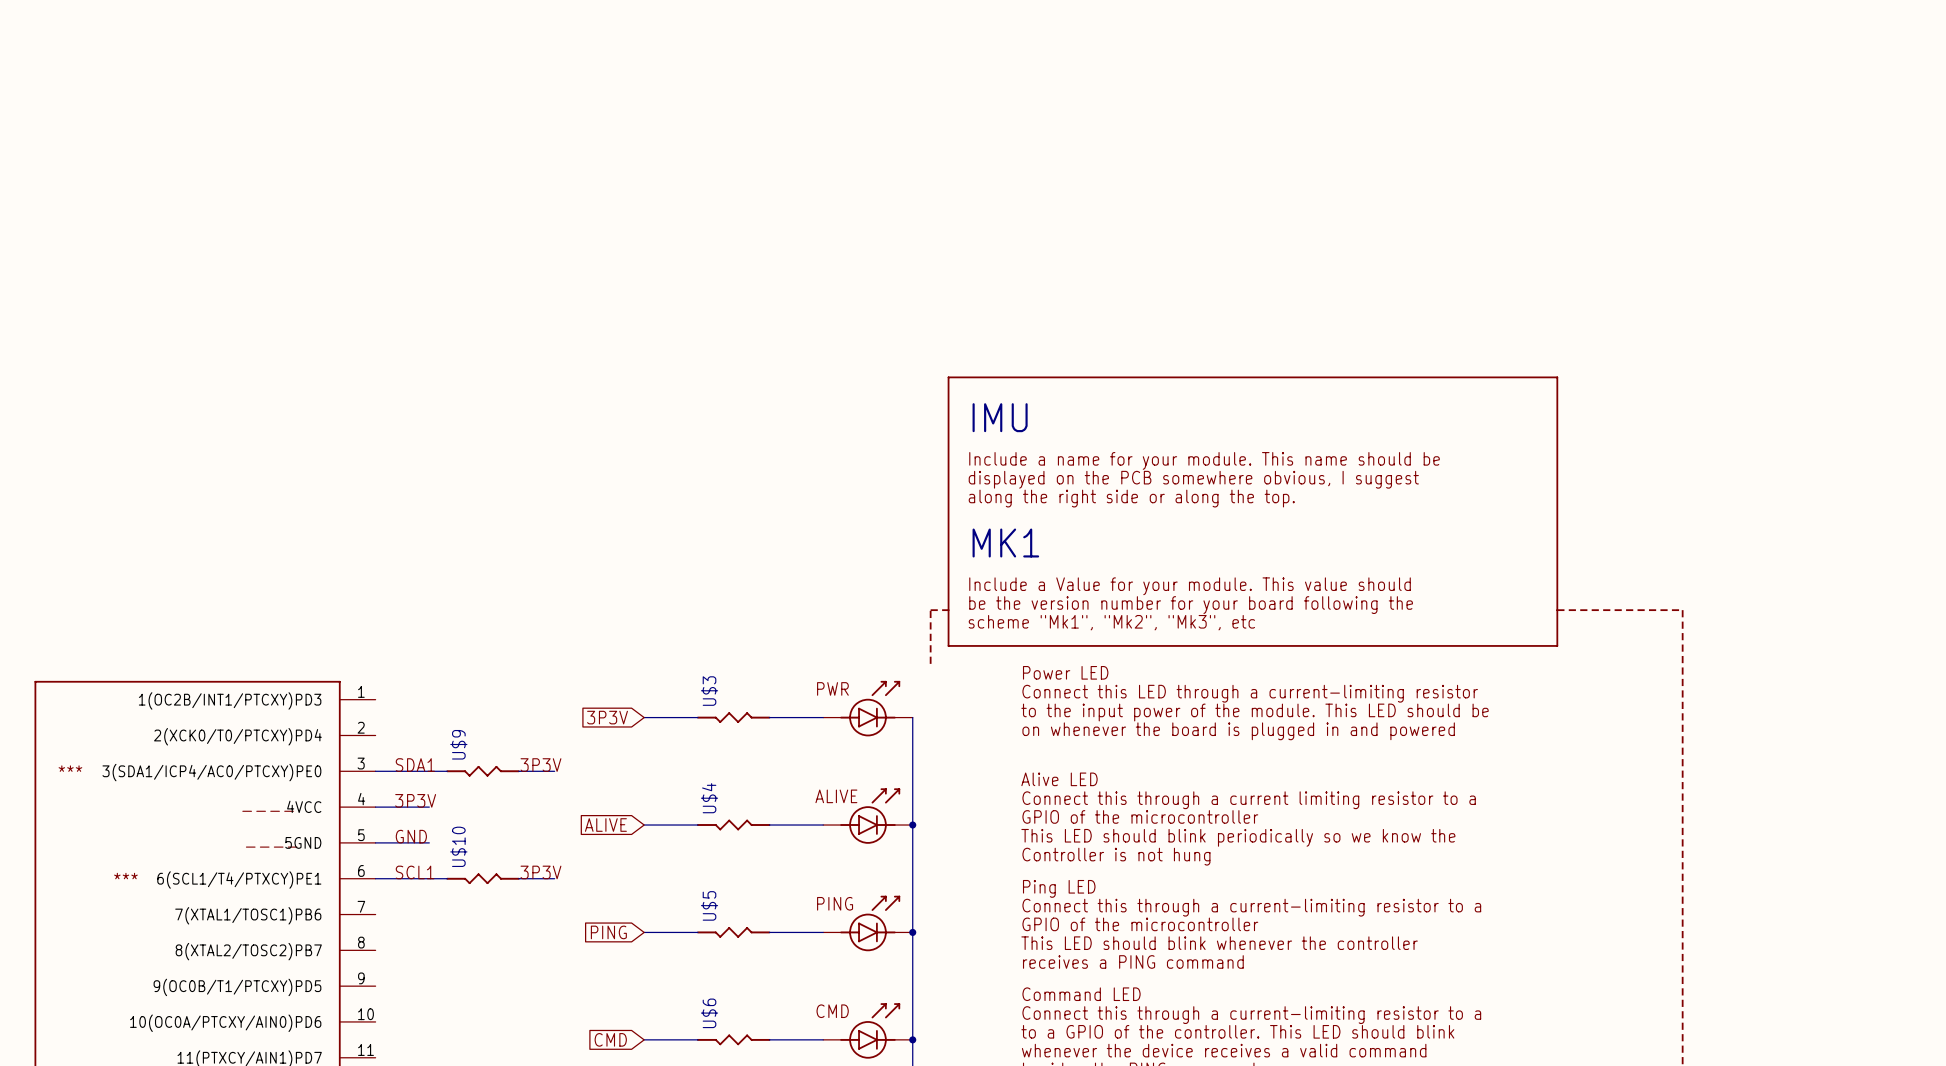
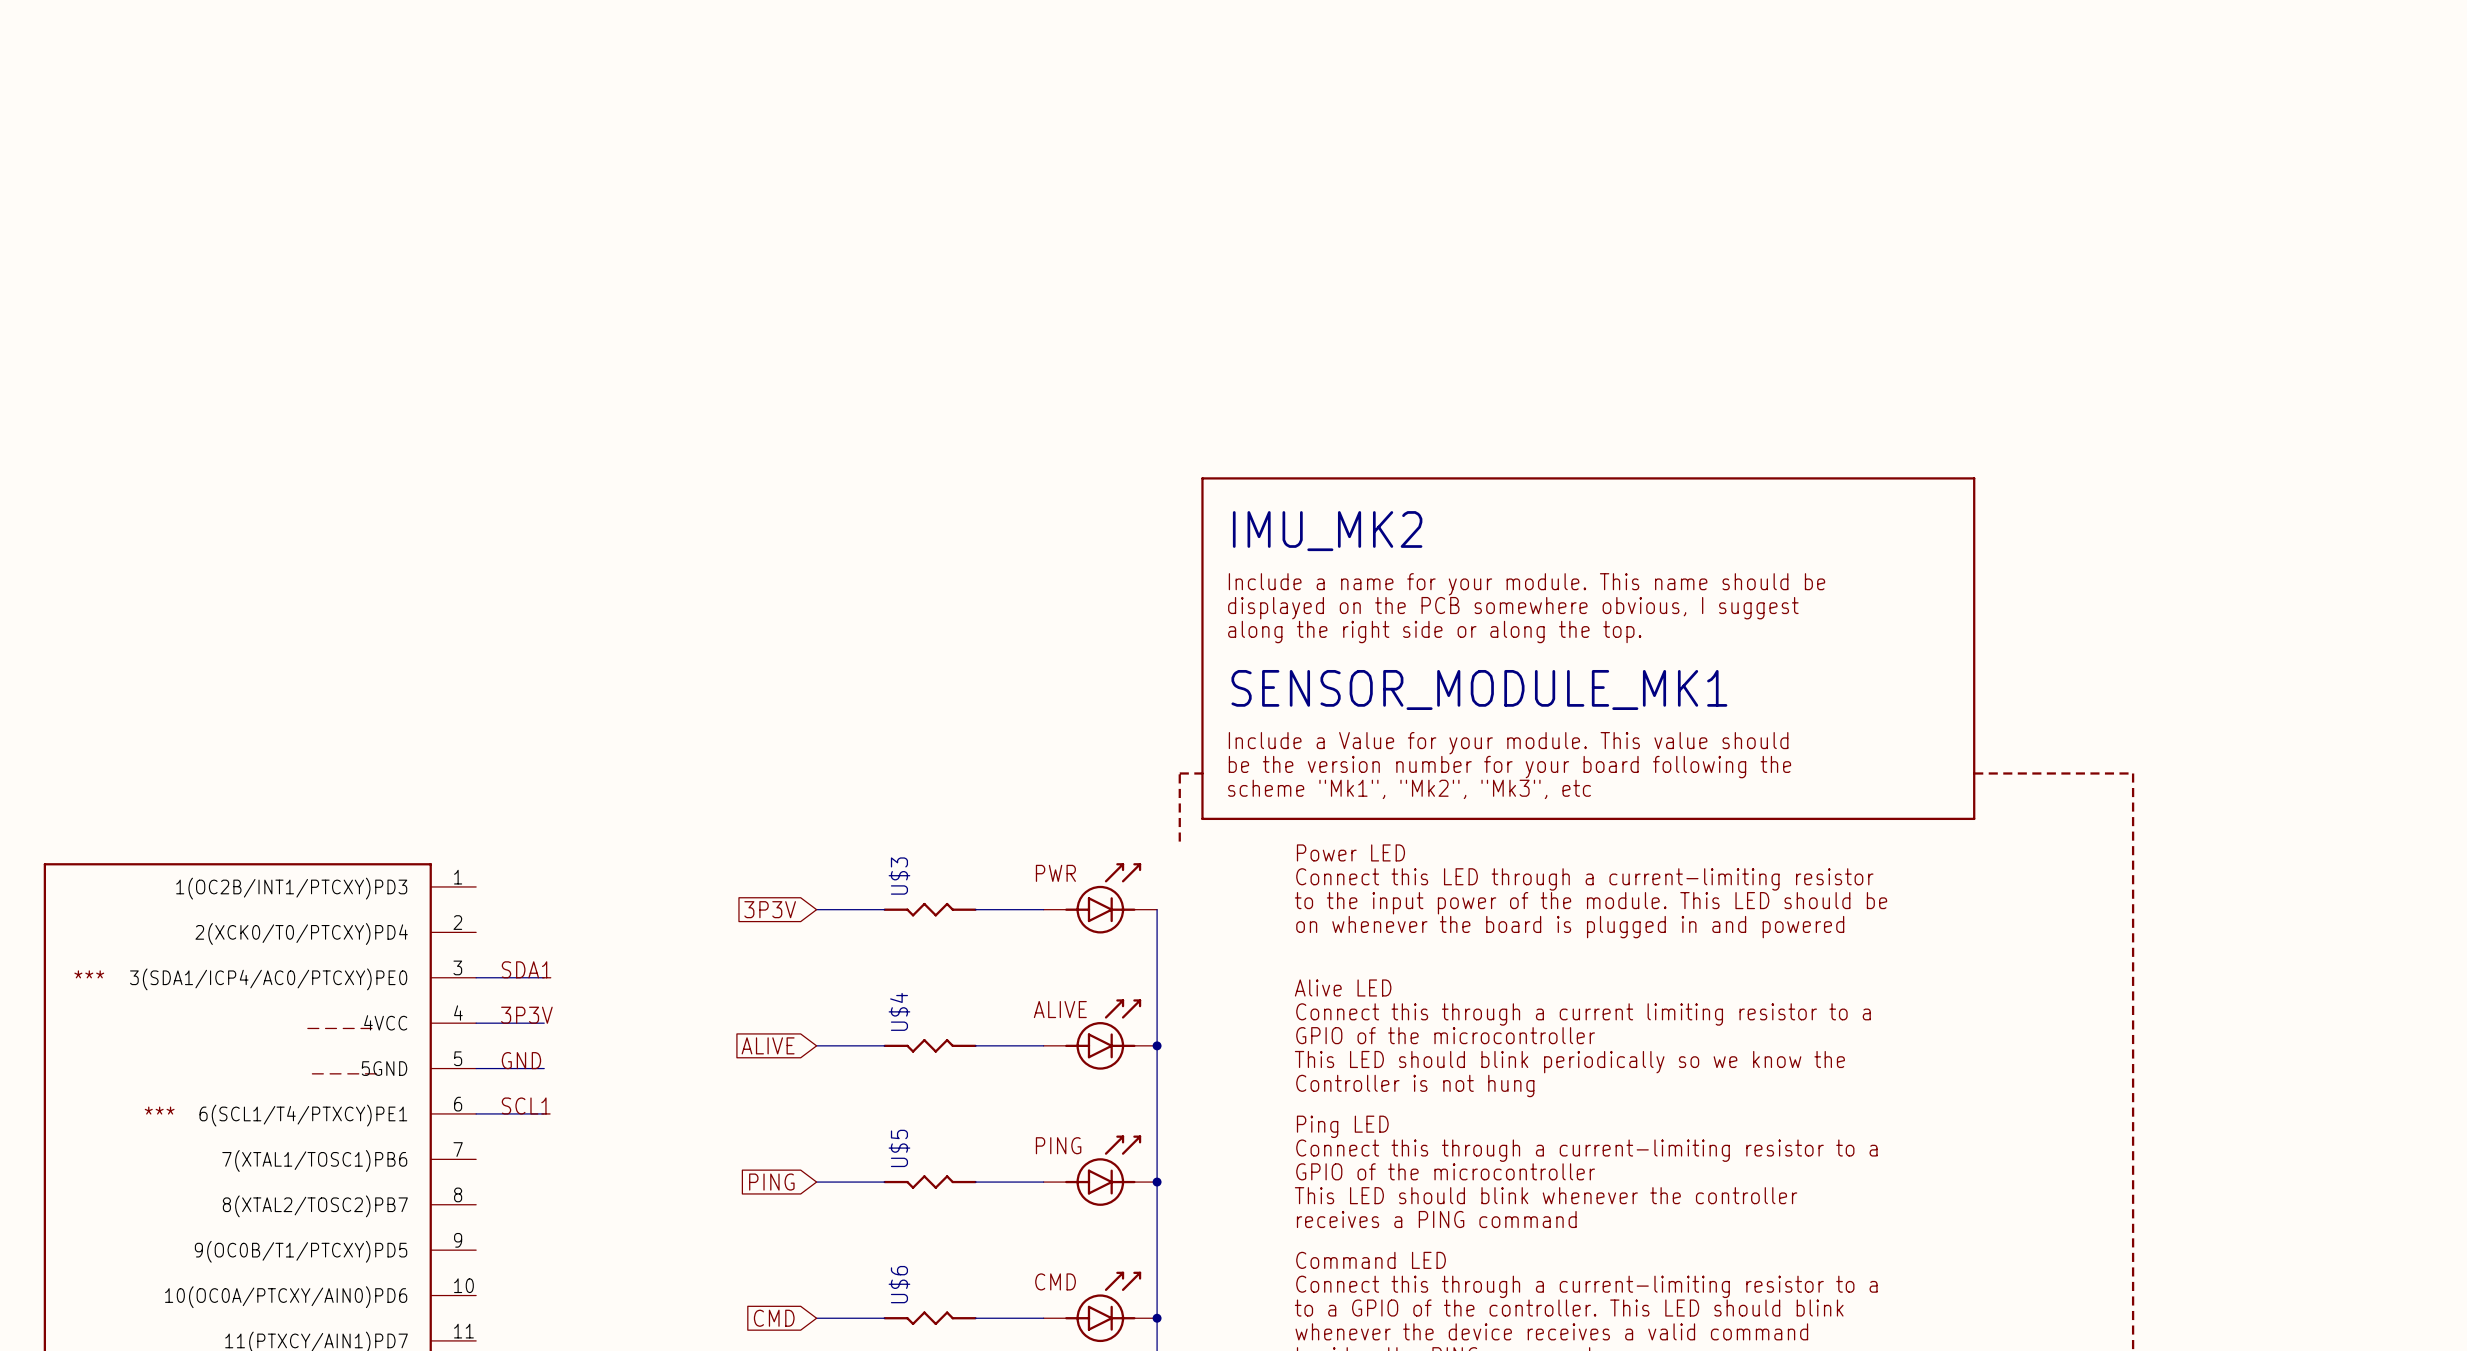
IMU name: IMU (1000, 417) -> IMU_MK2 (1327, 531)
IMU value: MK1 (1005, 543) -> SENSOR_MODULE_MK1 (1479, 689)
label: 3P3V (540, 765) -> none
wire: (429, 771) (447, 771) -> none
U$9: (483, 771) -> none
wire: (518, 771) (554, 771) -> none
label: 3P3V (540, 872) -> none
wire: (429, 878) (447, 878) -> none
U$10: (483, 878) -> none
wire: (518, 878) (554, 878) -> none

